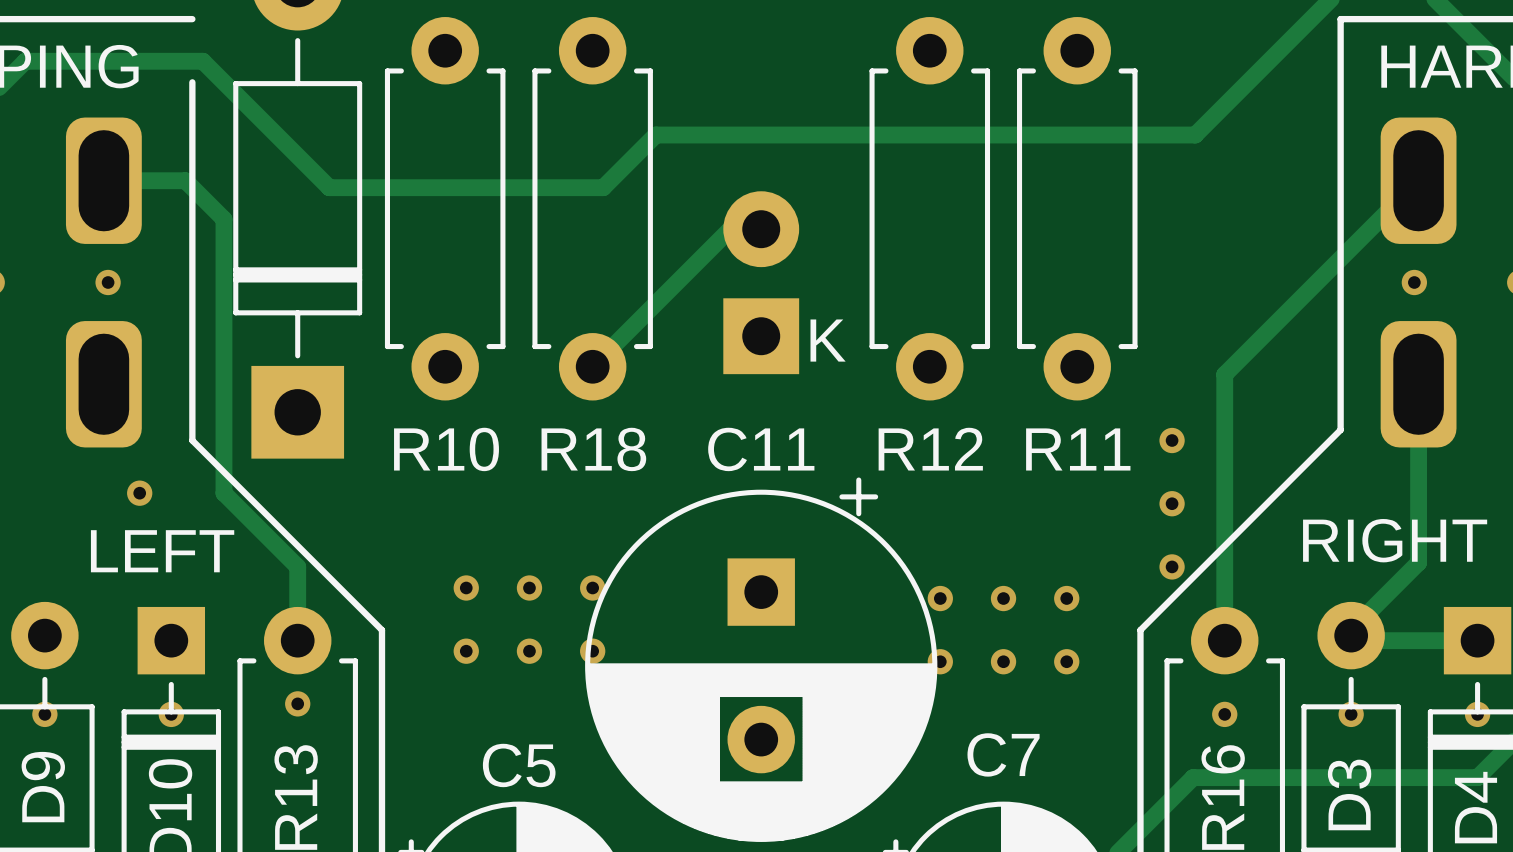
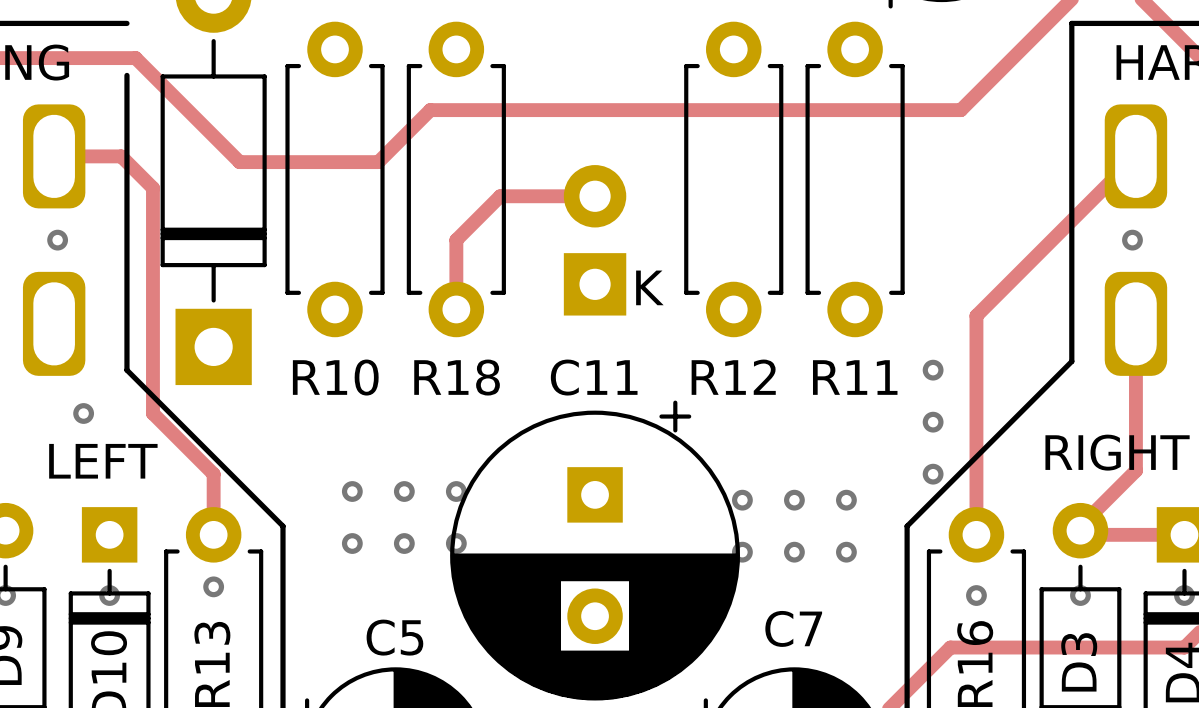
track: (1205, 124) (1195, 135) (655, 135) (603, 187) (497, 187) -> (960, 110) (430, 110) (378, 162)
track: (730, 229) (592, 366) -> (569, 196) (500, 196) (456, 240) (456, 309)

